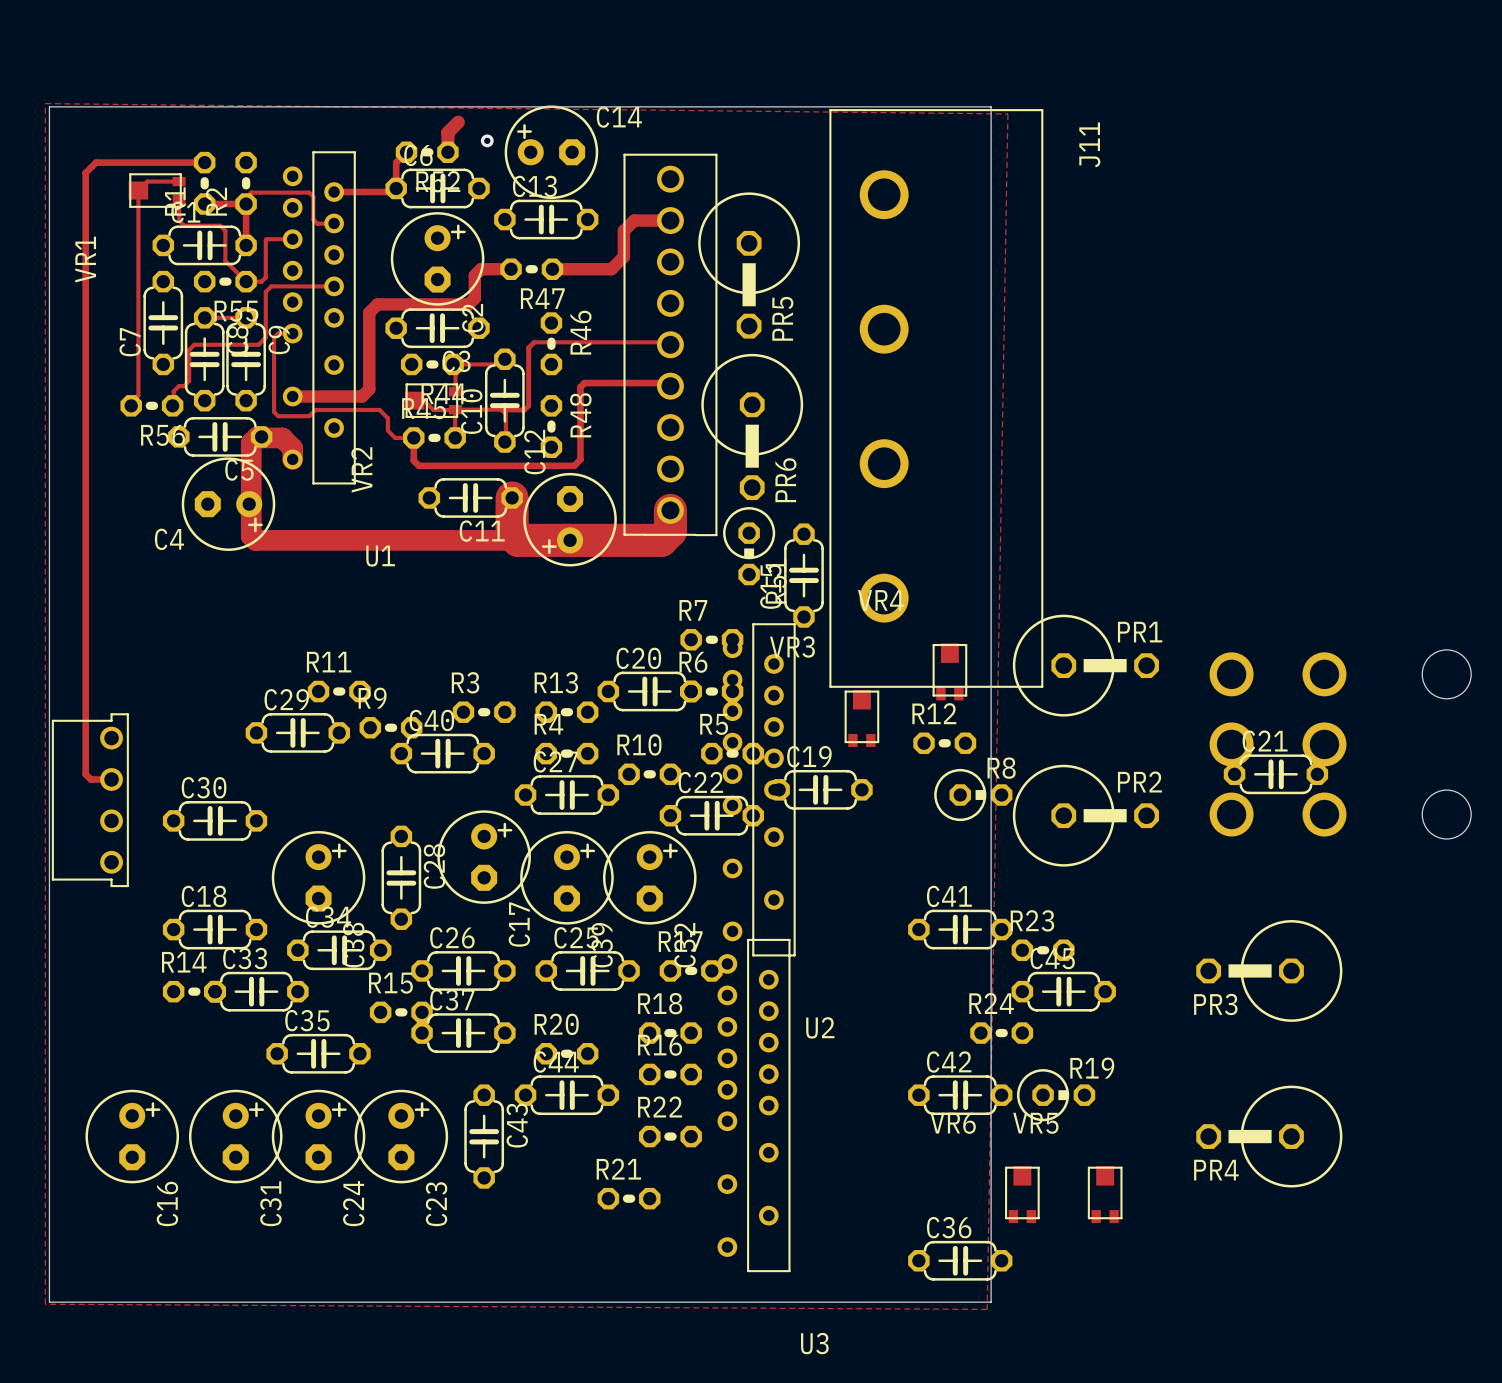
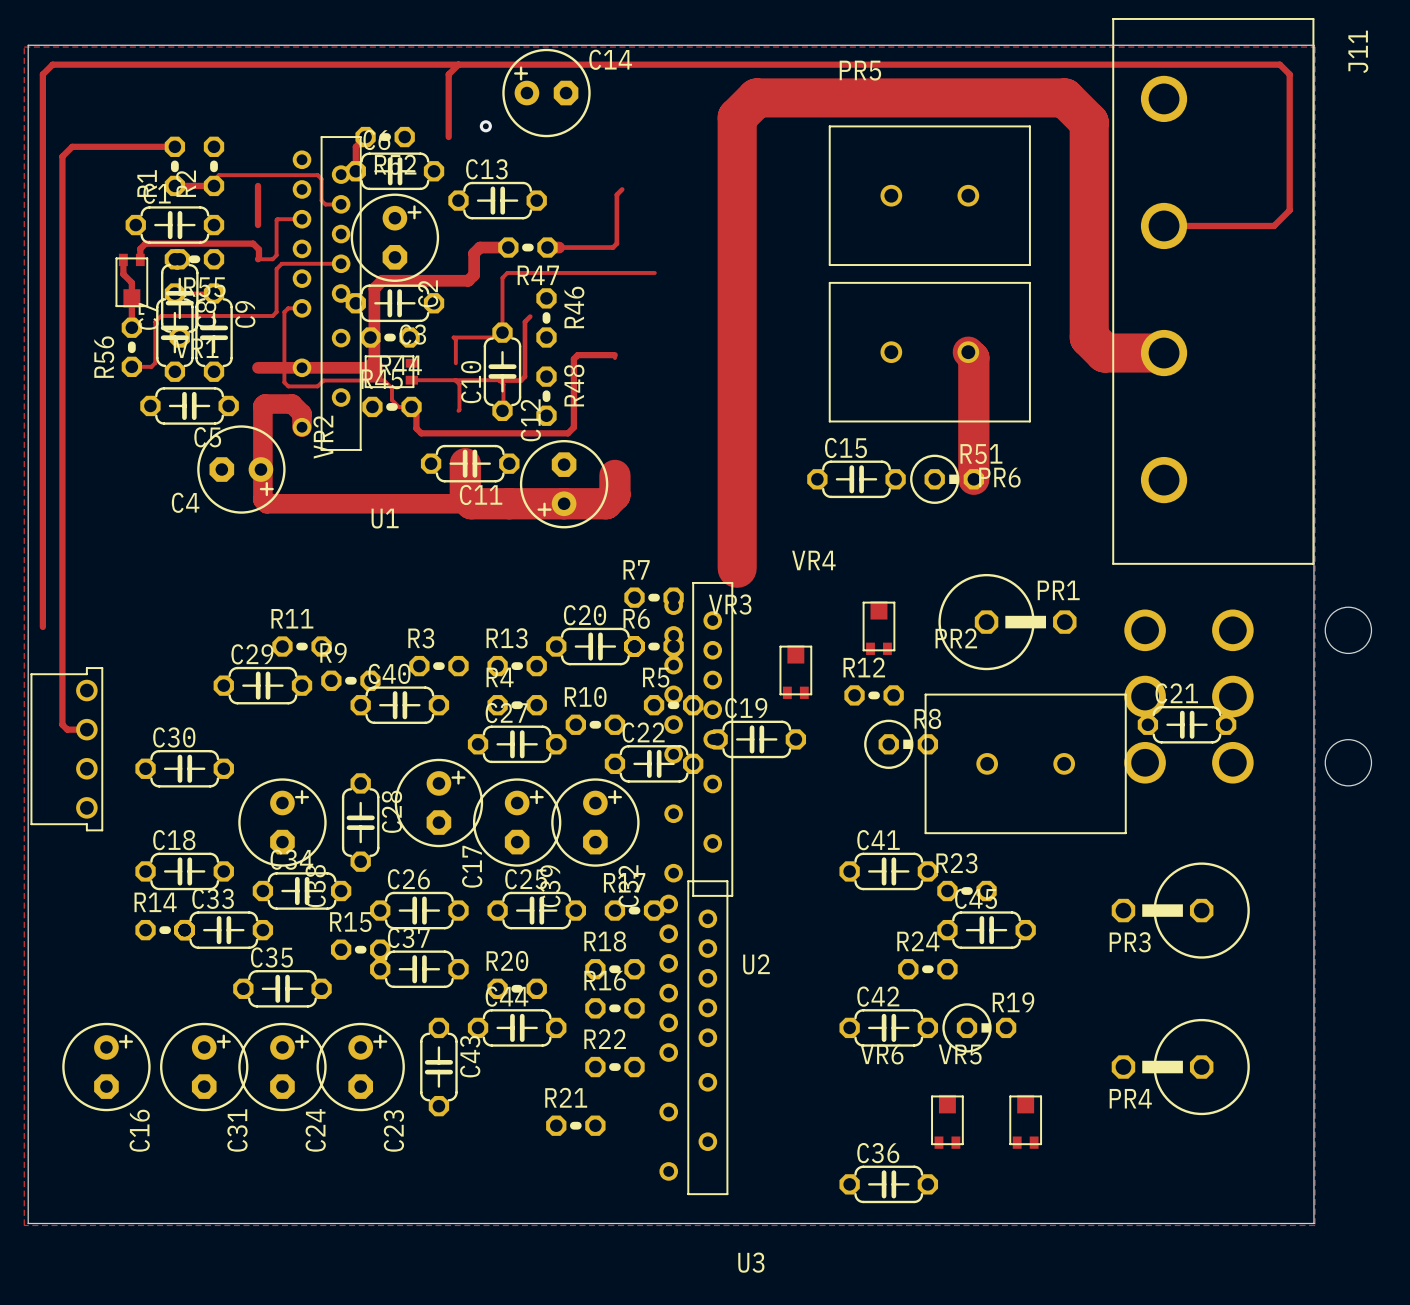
track: none -> (458, 64) (448, 74) (448, 137)
zone outline: (45, 103) (1007, 113) (987, 1309) (45, 1304) -> (24, 91) (24, 47) (1315, 47) (1315, 1225) (24, 1225)
board edge: (49, 106) (991, 106) (991, 1302) -> (28, 94) (28, 45) (1313, 45) (1313, 1223) (917, 1223)
track: (458, 122) (447, 132) (447, 152) -> none
via position: (487, 140) -> (485, 126)
C14 position: (551, 152) -> (546, 93)
track: (179, 181) (147, 181) (138, 190) (138, 395) (131, 405) -> none
VR1 rotation: 0° (157, 190) -> 90° counterclockwise (131, 280)
VR1 position: (157, 190) -> (131, 280)
track: (309, 192) (313, 196) (313, 219) (317, 223) (333, 223) -> (273, 175) (317, 175) (321, 179) (321, 200) (325, 204) (340, 204)
track: (334, 192) (380, 192) -> (297, 263) (341, 263)
PR5 footprint: [698, 192, 801, 339] -> [828, 125, 1031, 266]
track: (179, 199) (179, 220) (184, 225) (220, 225) (225, 230) (225, 260) (246, 281) (261, 281) (265, 277) (266, 239) (292, 239) -> none
track: (246, 204) (246, 245) -> (258, 185) (258, 225)
track: (670, 220) (634, 220) (623, 230) (623, 256) (611, 269) -> (622, 189) (616, 194) (616, 243) (612, 247) (559, 247)
track: none -> (302, 219) (276, 220) (276, 255) (272, 259) (258, 259) (258, 249) (253, 243) (145, 243) (140, 248) (140, 259)
track: none -> (1164, 225) (1274, 225) (1289, 210) (1289, 74) (1279, 64) (52, 64) (42, 74) (42, 626)
track: (511, 269) (481, 269) (474, 275) (474, 298) (468, 304) -> (503, 247) (479, 247) (474, 253) (474, 274) (468, 280) (424, 280)
R47 position: (531, 269) -> (527, 247)
track: (557, 269) (599, 269) -> none
track: none -> (123, 259) (123, 274) (131, 282) (131, 327)
track: (317, 286) (271, 286) (265, 291) (265, 337) (258, 344) (194, 344) (189, 349) (189, 381) (173, 391) (172, 405) -> (281, 263) (276, 269) (276, 312) (272, 315) (161, 315) (155, 321) (155, 362) (151, 366) (131, 366)
track: none -> (654, 272) (507, 272) (502, 277) (502, 332) (497, 337) (453, 337) (455, 339) (455, 363)
track: (424, 304) (377, 304) (369, 312) (369, 389) (362, 396) -> (382, 280) (374, 288) (374, 360) (367, 367) (323, 367)
U1 position: (319, 317) -> (327, 293)
PR5 name position: PR5 (782, 318) -> PR5 (860, 70)
C7 position: (163, 323) -> (179, 298)
track: (292, 333) (277, 333) (274, 337) (274, 412) (278, 416) (309, 416) (315, 409) (362, 409) -> (302, 308) (288, 308) (284, 312) (284, 382) (288, 386) (317, 386) (323, 380)
track: none -> (530, 316) (524, 321) (524, 376) (521, 380) (499, 380)
R46 position: (551, 343) -> (546, 317)
track: (670, 344) (668, 342) (534, 342) (528, 347) (528, 405) (524, 409) (501, 409) -> (499, 380) (455, 380)
part: (670, 344) -> none
PR6 footprint: [701, 353, 804, 501] -> [828, 281, 1031, 423]
track: (504, 359) (499, 364) (453, 364) (455, 366) (455, 391) -> none
track: none -> (968, 352) (973, 357) (973, 479)
track: none -> (1164, 353) (1104, 353) (1089, 337) (1089, 122) (1064, 97) (756, 97) (737, 117) (737, 568)
track: (631, 383) (584, 383) (580, 387) (580, 459) (574, 465) -> (577, 355) (573, 359) (573, 427) (568, 433) (524, 433)
J11 position: (936, 398) -> (1213, 291)
track: (414, 400) (424, 400) (433, 409) (455, 409) (455, 437) -> none
C10 position: (504, 400) -> (502, 371)
R56 rotation: 0° (151, 405) -> 90° clockwise (131, 347)
track: (379, 409) (387, 418) (387, 430) (395, 437) (413, 437) (413, 460) (418, 465) (465, 465) -> (340, 380) (384, 380) (391, 388) (391, 400) (398, 406) (416, 406) (416, 428) (421, 433)
track: none -> (499, 380) (503, 384) (502, 410)
R48 position: (551, 426) -> (546, 396)
track: (292, 459) (292, 448) (282, 437) (257, 436) (251, 443) (251, 502) (249, 504) (251, 503) (251, 536) (255, 540) (301, 540) -> (302, 427) (302, 413) (292, 404) (264, 404) (262, 405) (262, 499) (266, 503)
PR6 name position: PR6 (785, 480) -> PR6 (999, 477)
C11 position: (470, 497) -> (470, 463)
C4 position: (228, 504) -> (241, 469)
C12 position: (570, 519) -> (564, 484)
R51 rotation: 0° (749, 546) -> 90° counterclockwise (947, 479)
R51 position: (749, 546) -> (947, 479)
C15 rotation: 0° (803, 575) -> 90° clockwise (856, 479)
C15 position: (803, 575) -> (856, 479)
PR2 footprint: [1012, 764, 1159, 867] -> [924, 693, 1127, 835]
PR2 name position: PR2 (1139, 781) -> PR2 (956, 638)

